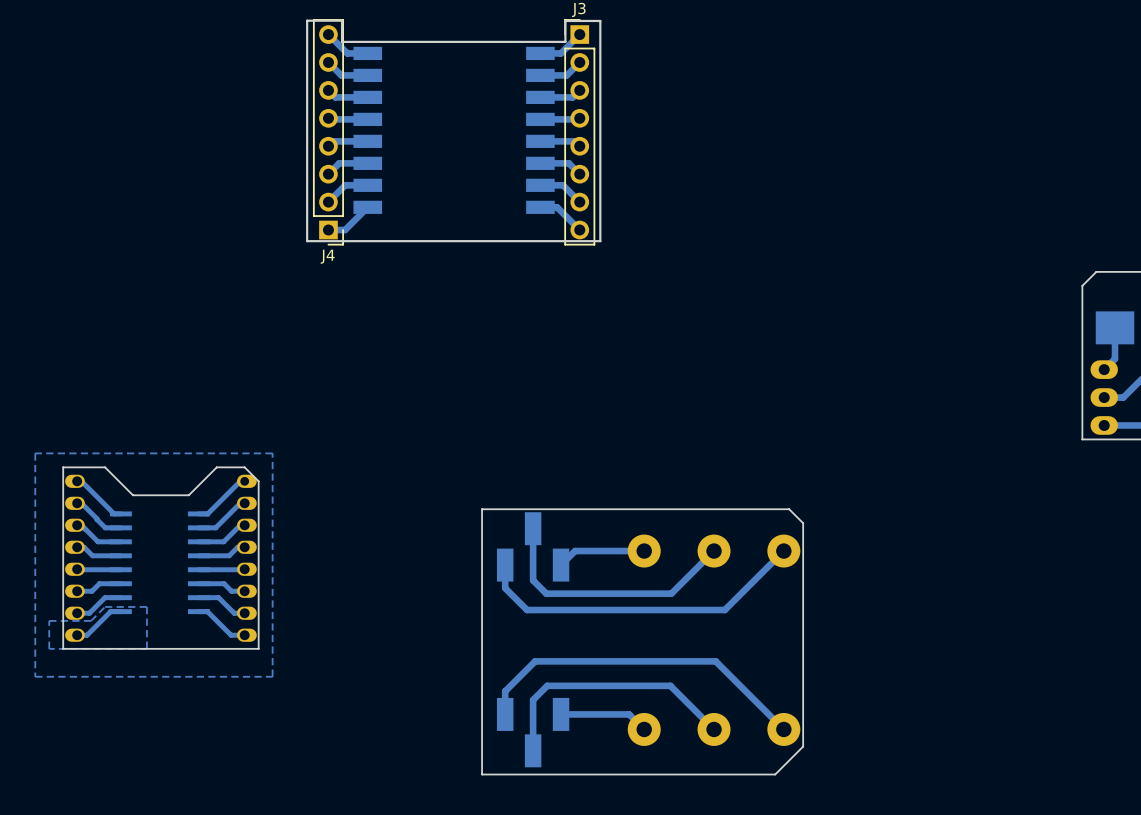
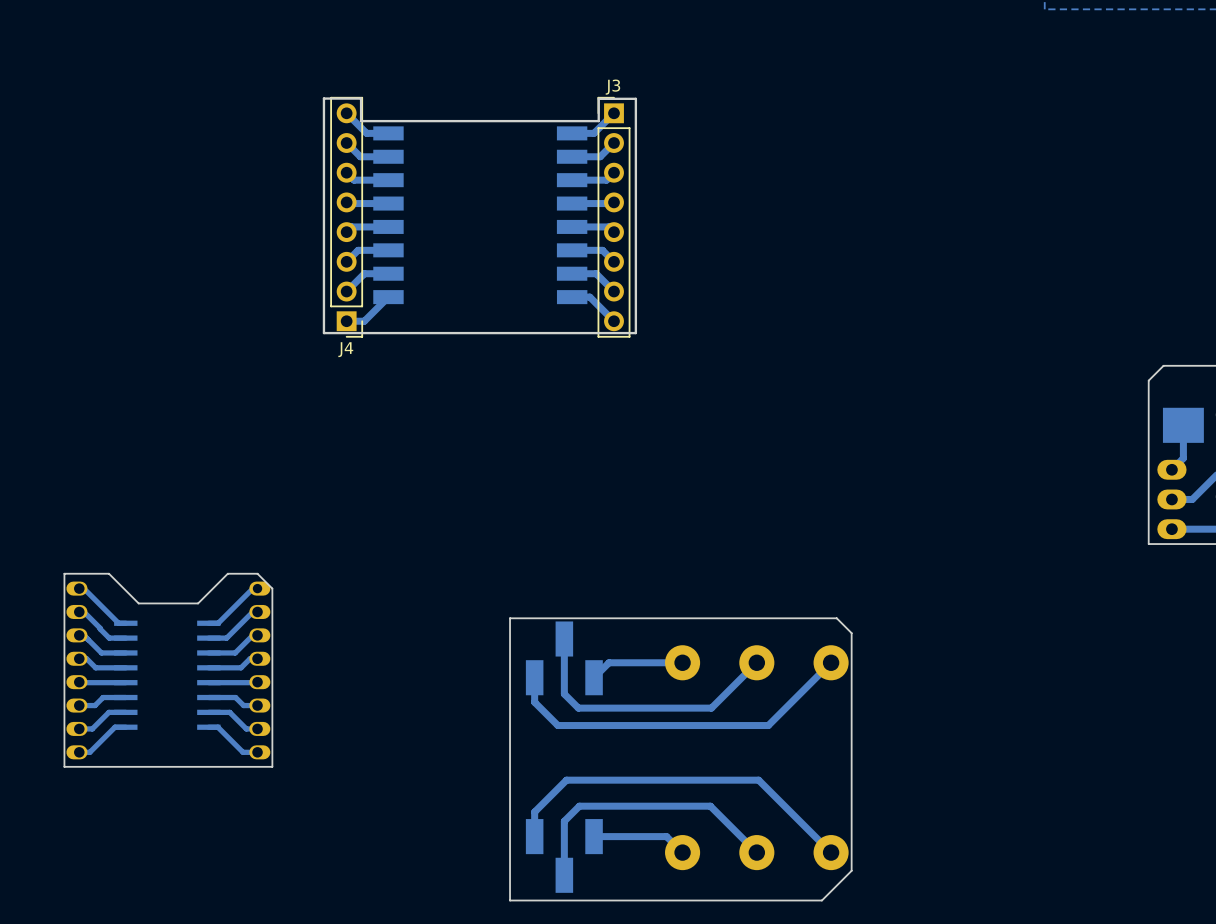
bottom zone outline: (35, 453) (35, 676) (272, 676) (272, 453) (35, 453) -> none
bottom zone outline: (105, 606) (91, 620) (49, 620) (49, 648) (146, 648) (146, 606) (105, 606) -> none

